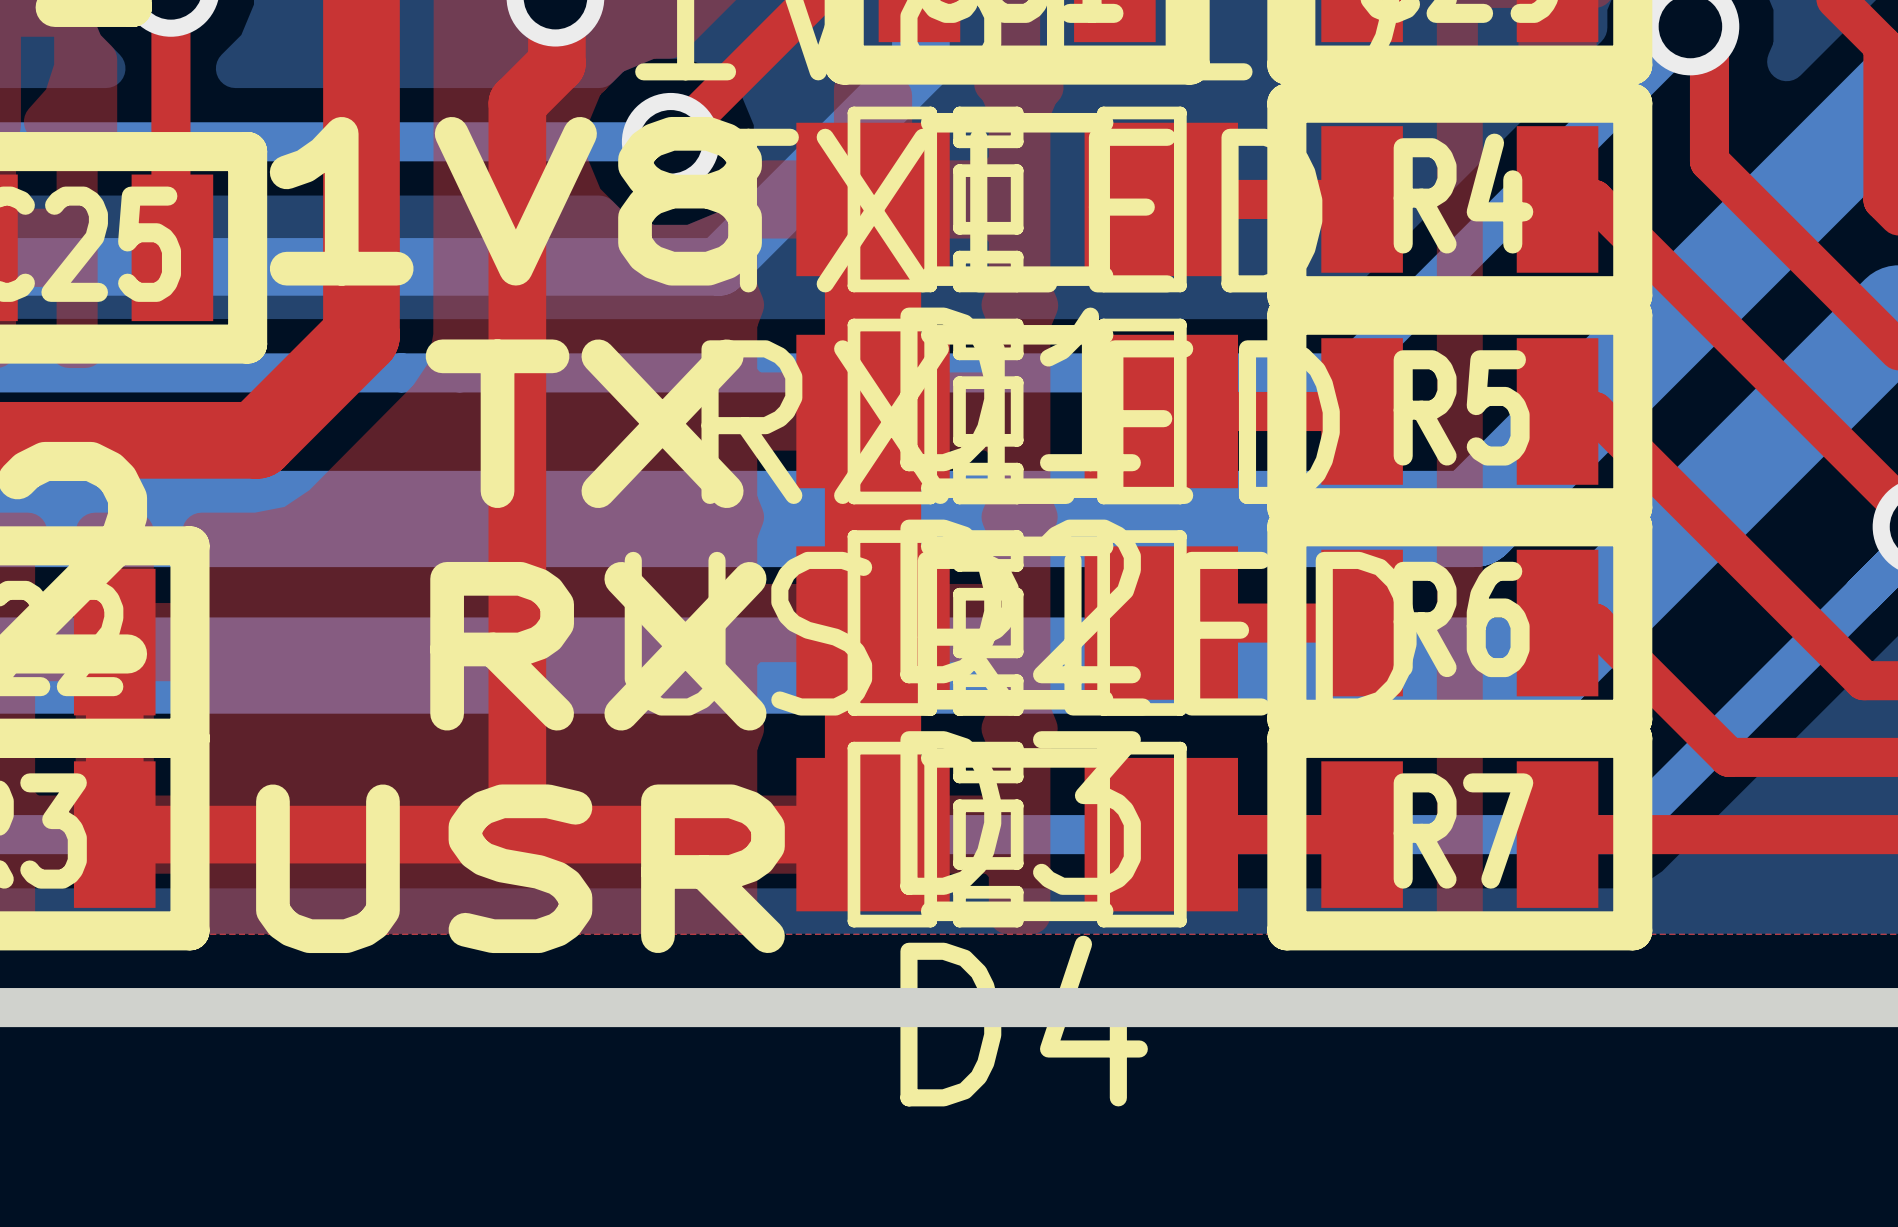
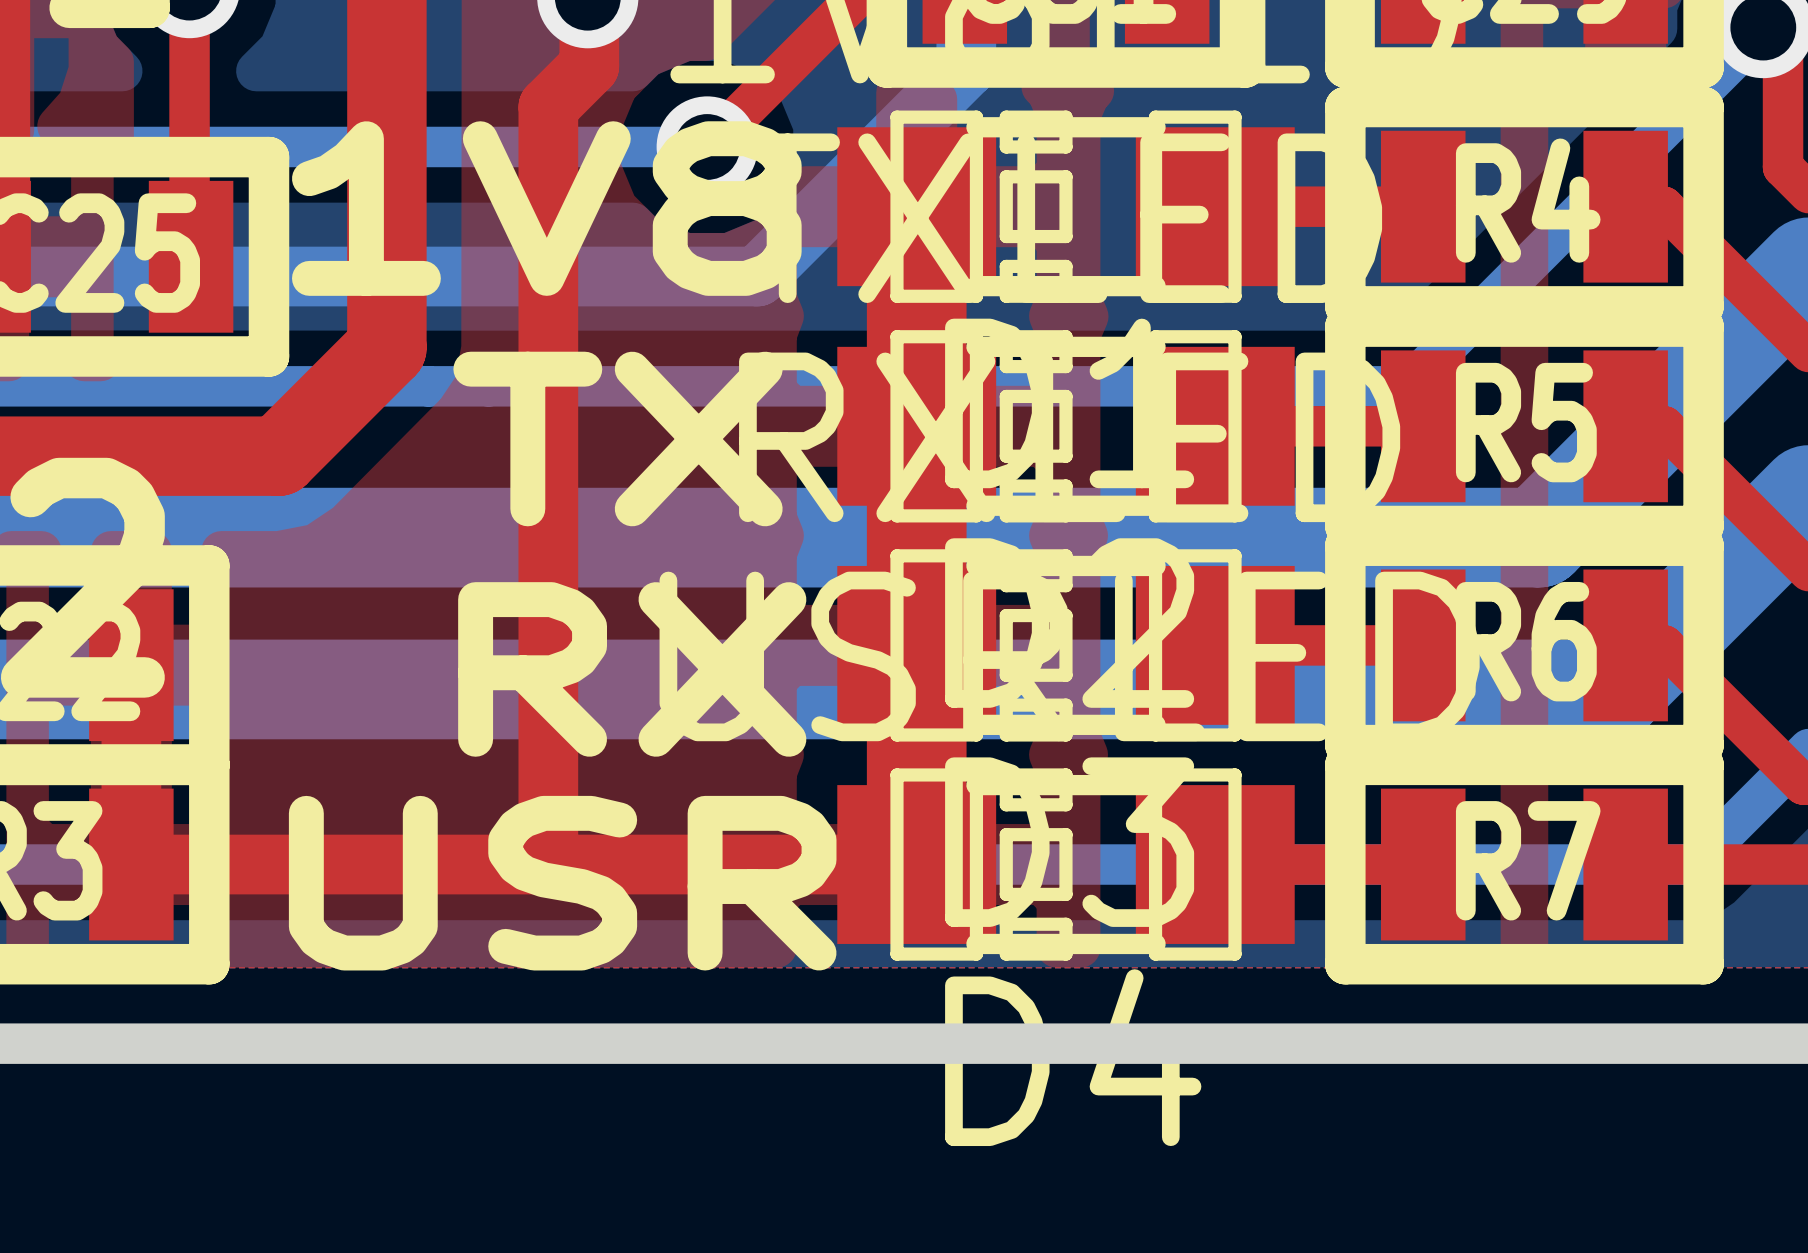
text position: USR (520, 868) -> USR (562, 883)

